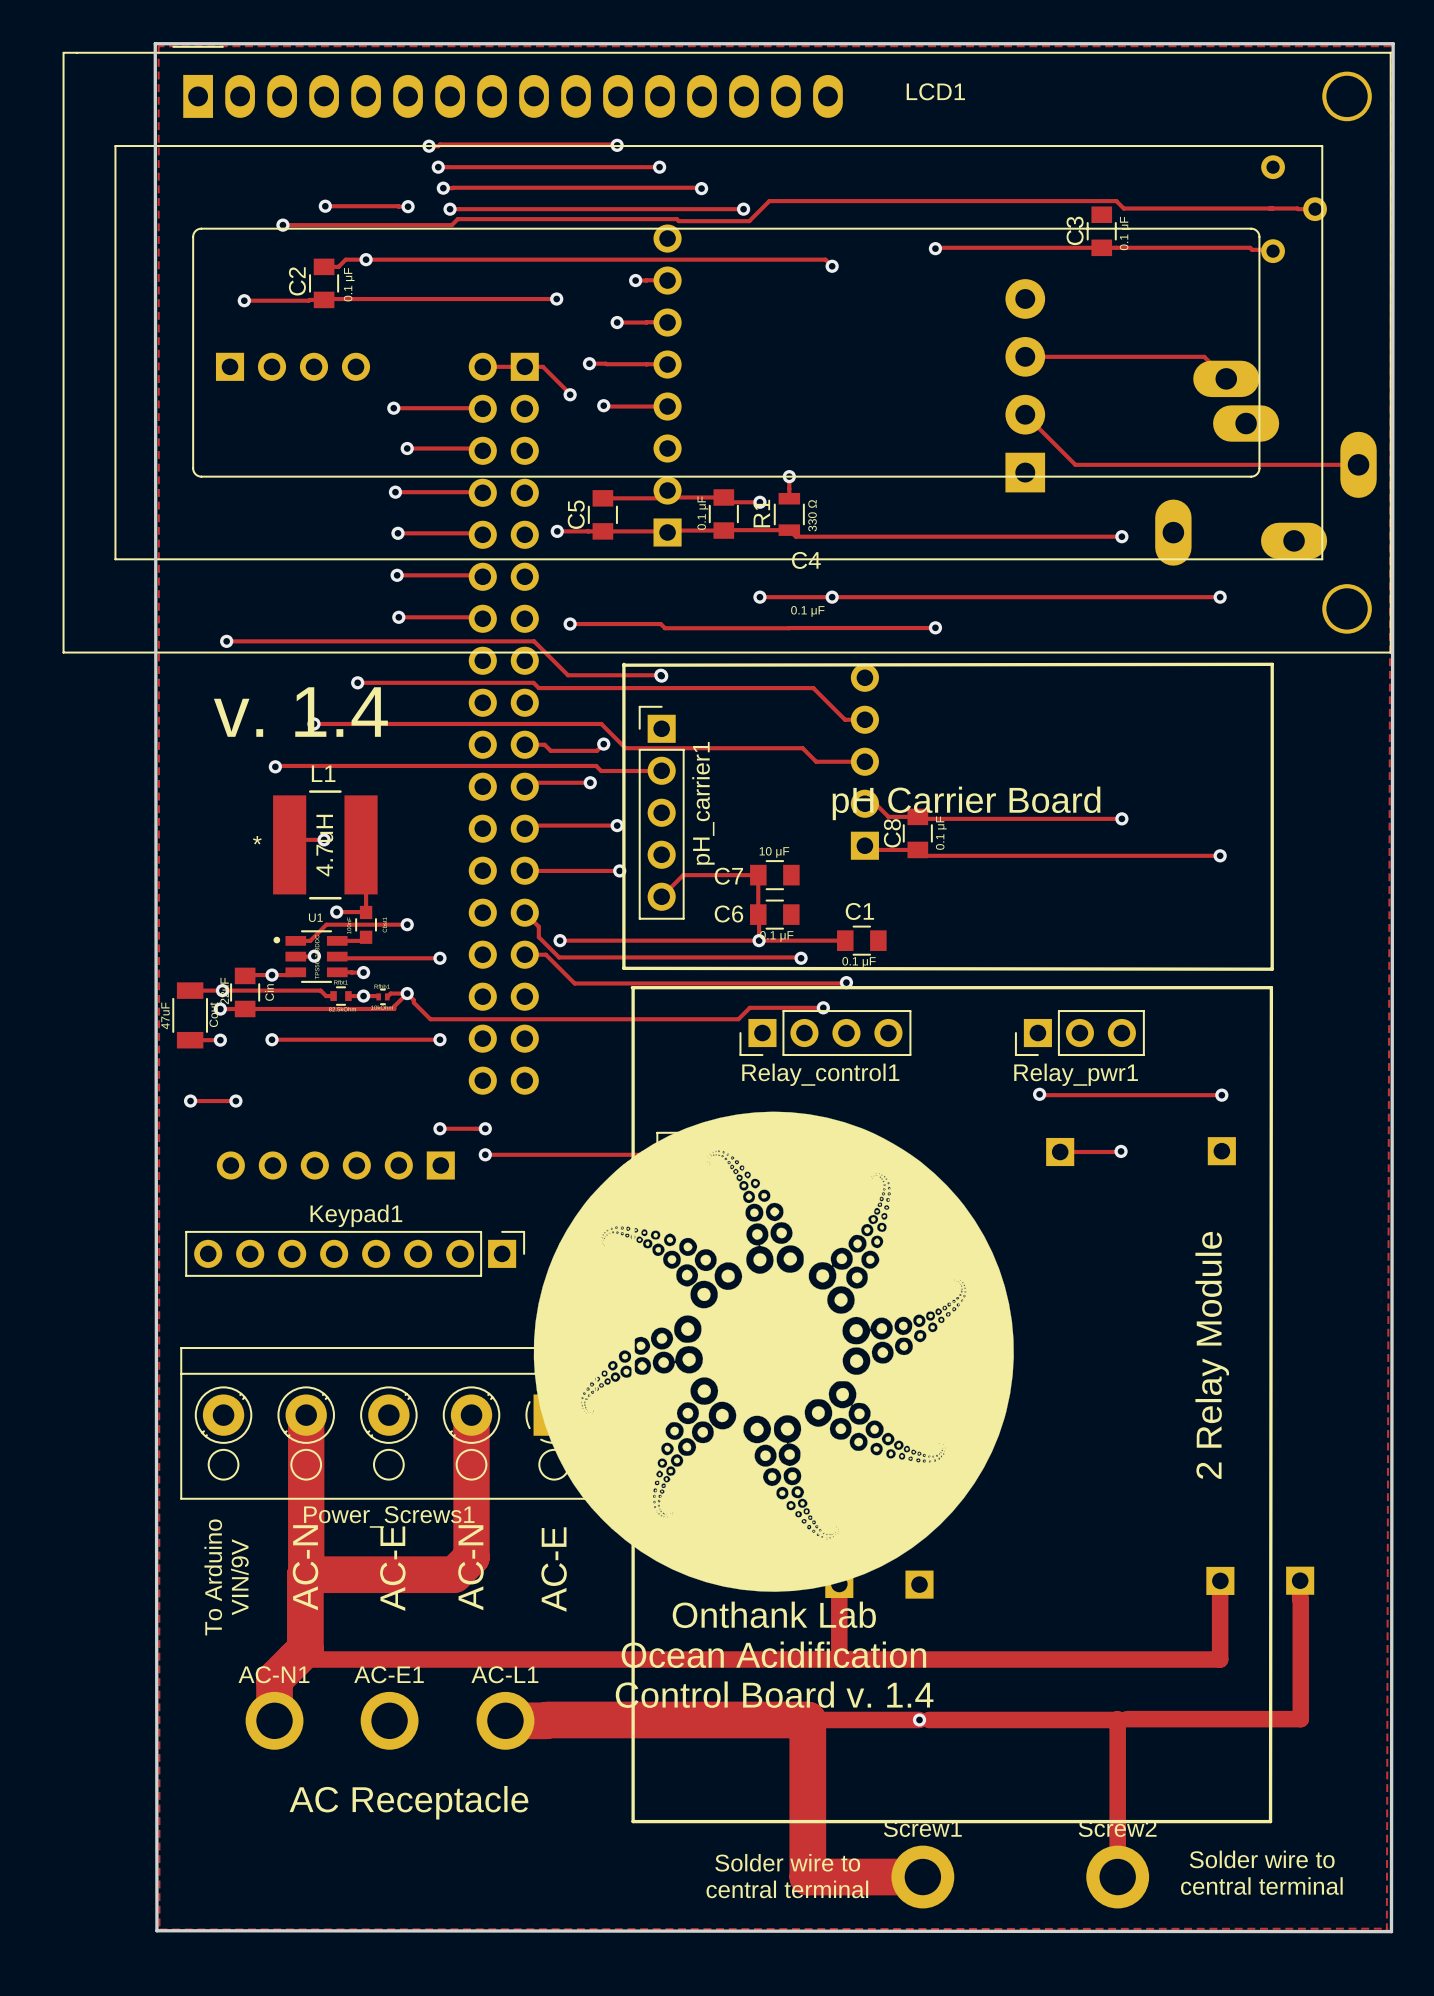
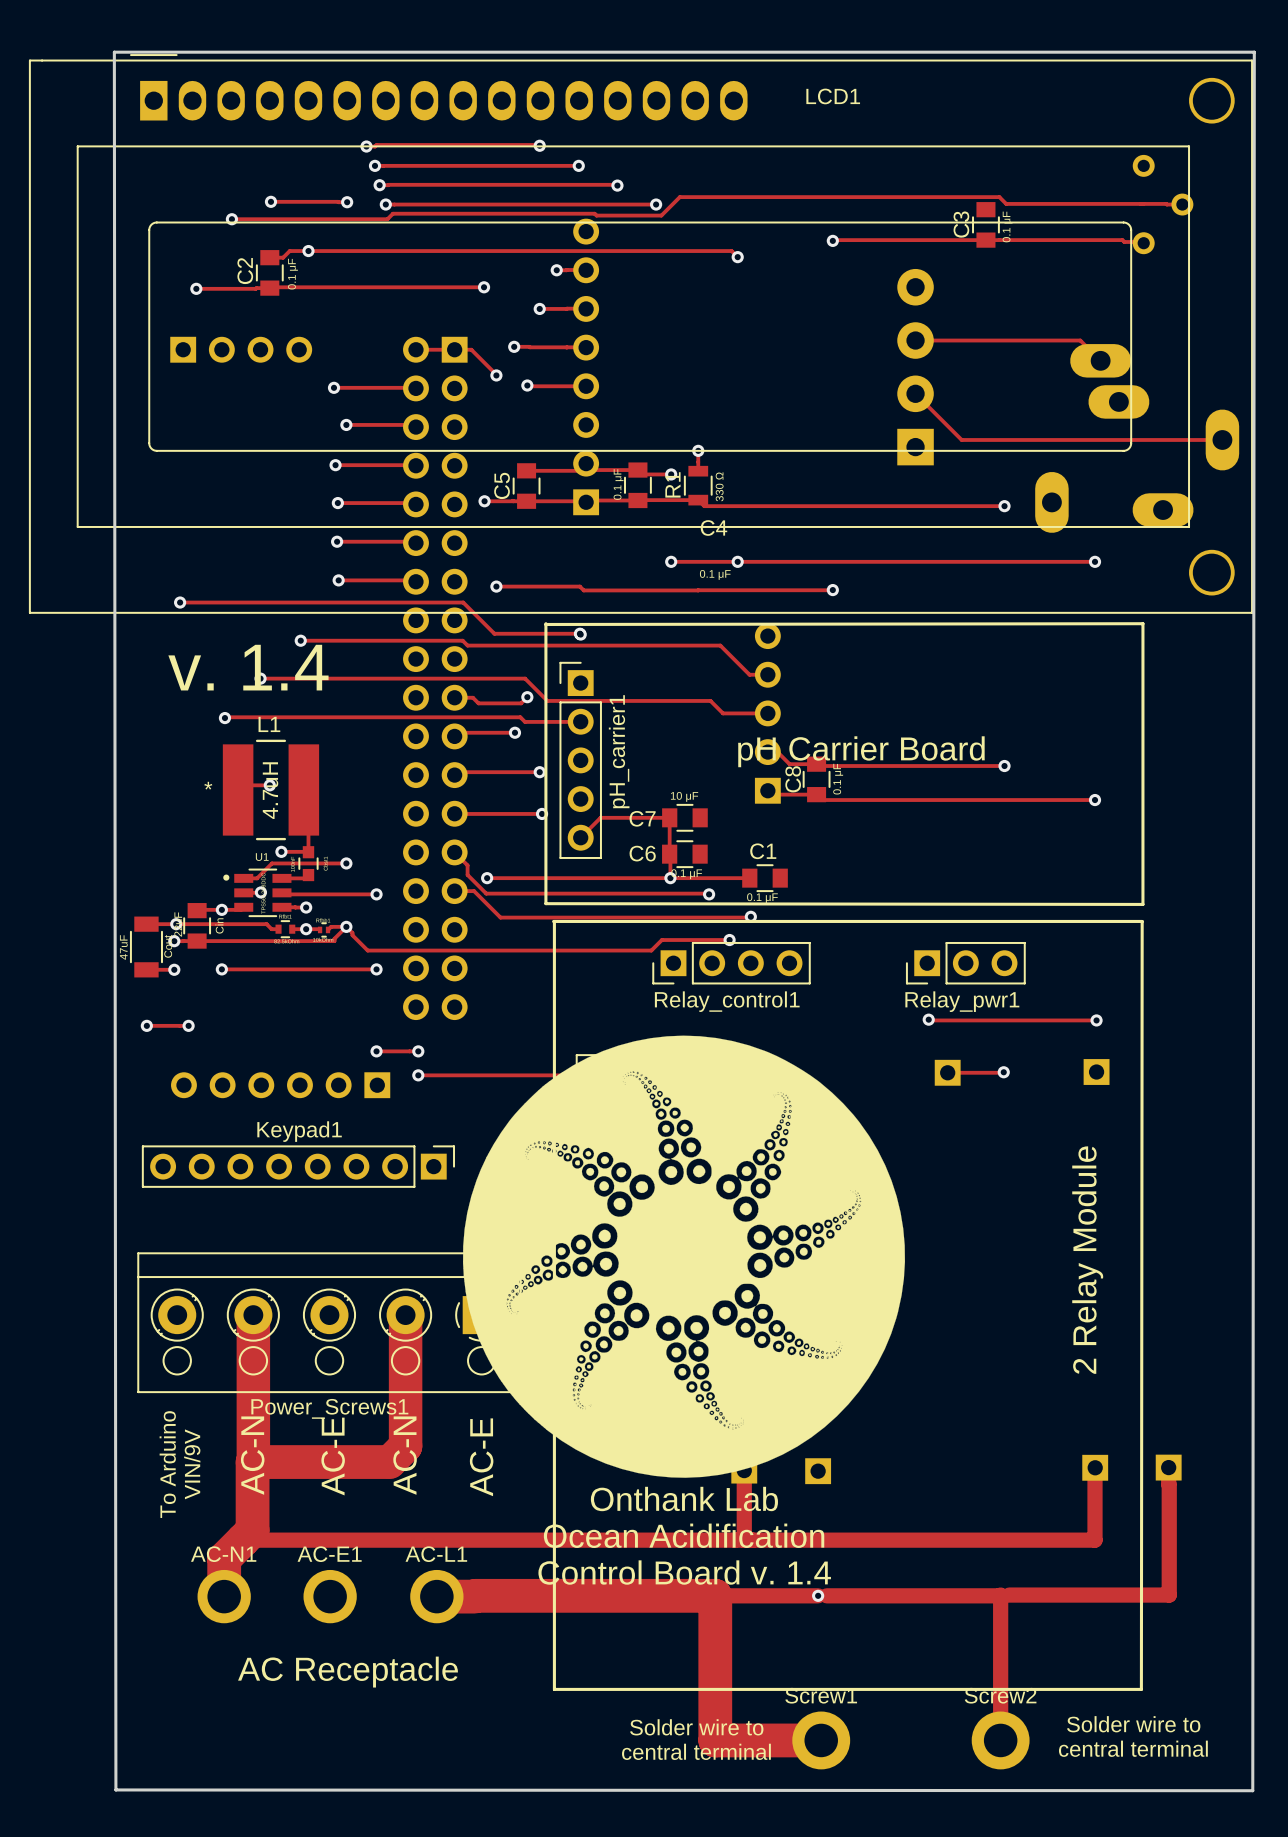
zone outline: (158, 46) (1391, 46) (1386, 1931) (1388, 1928) (159, 1929) (158, 46) -> none

